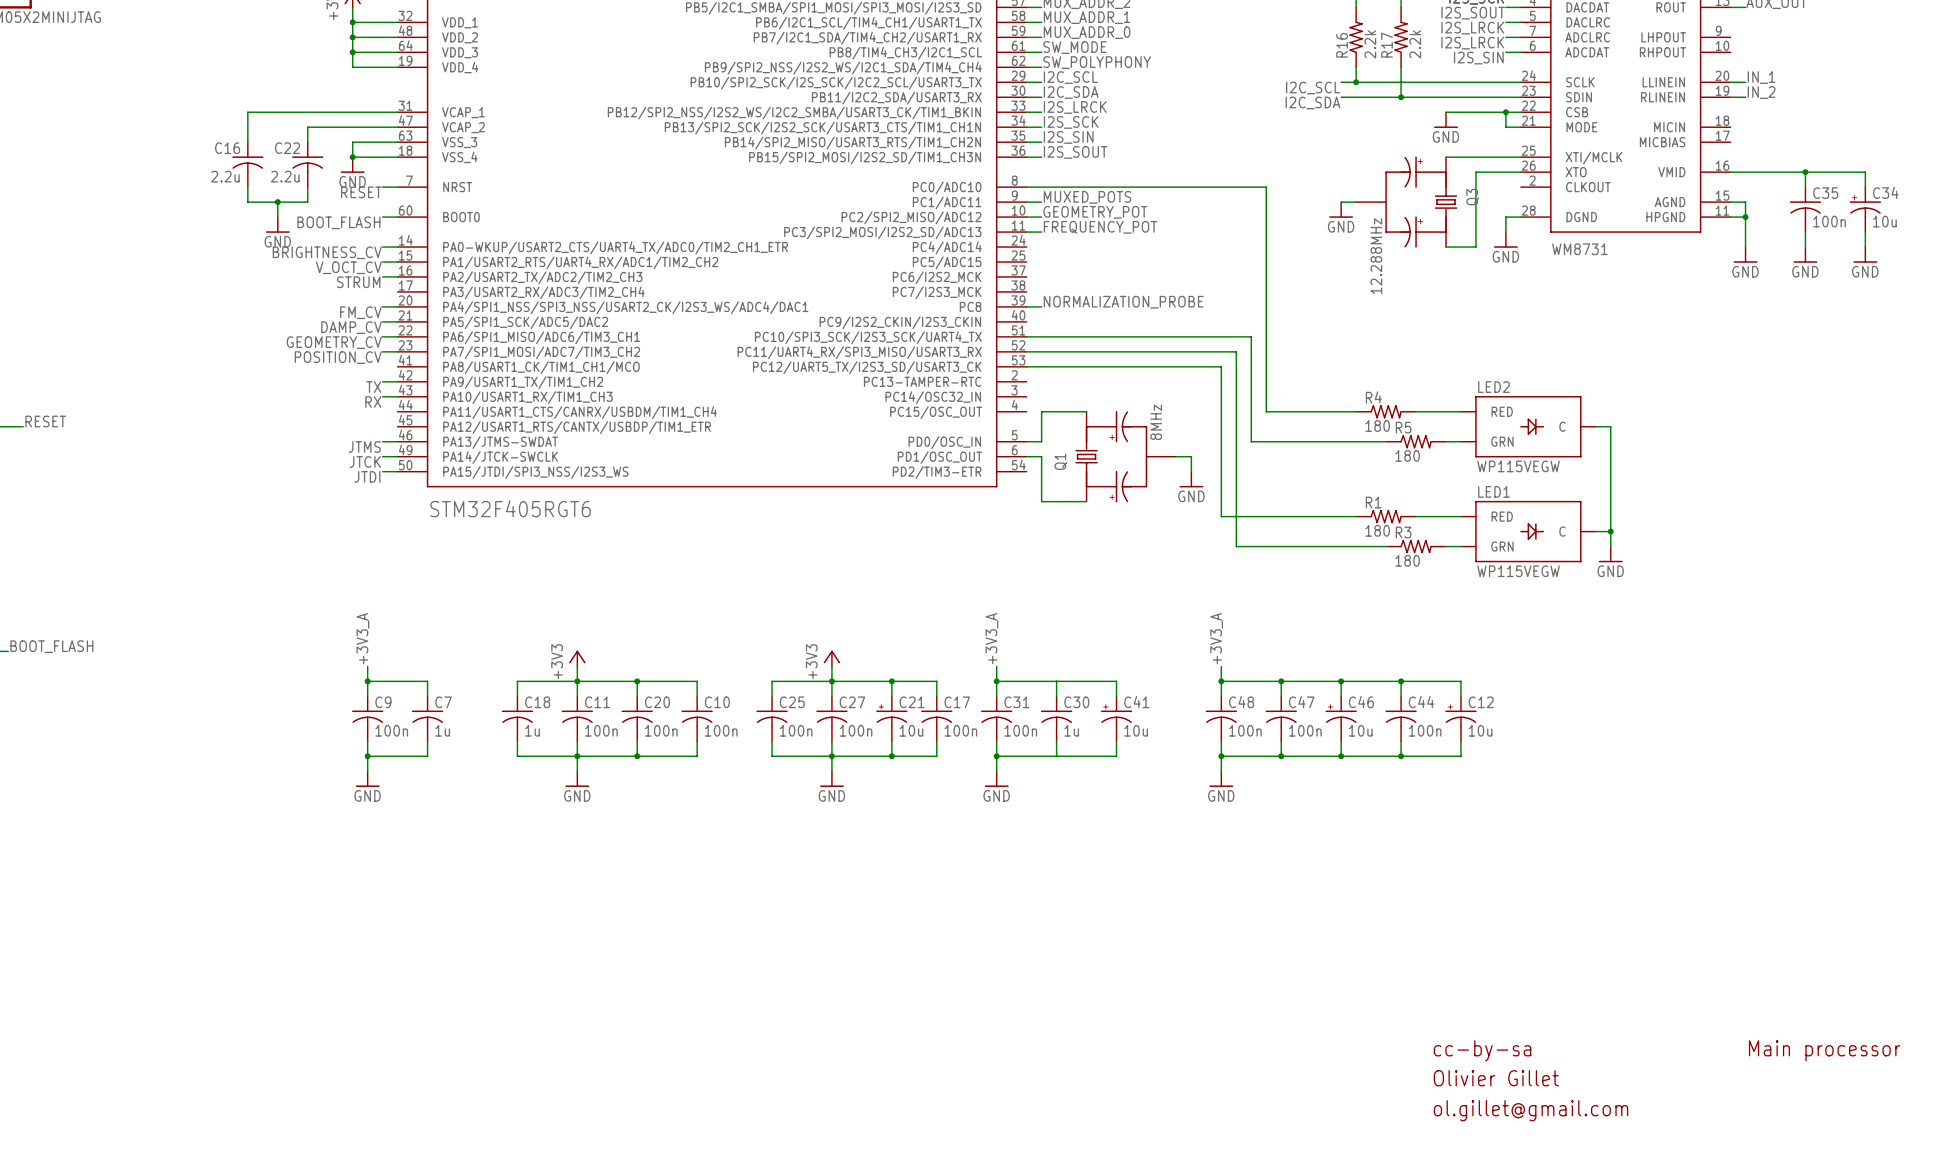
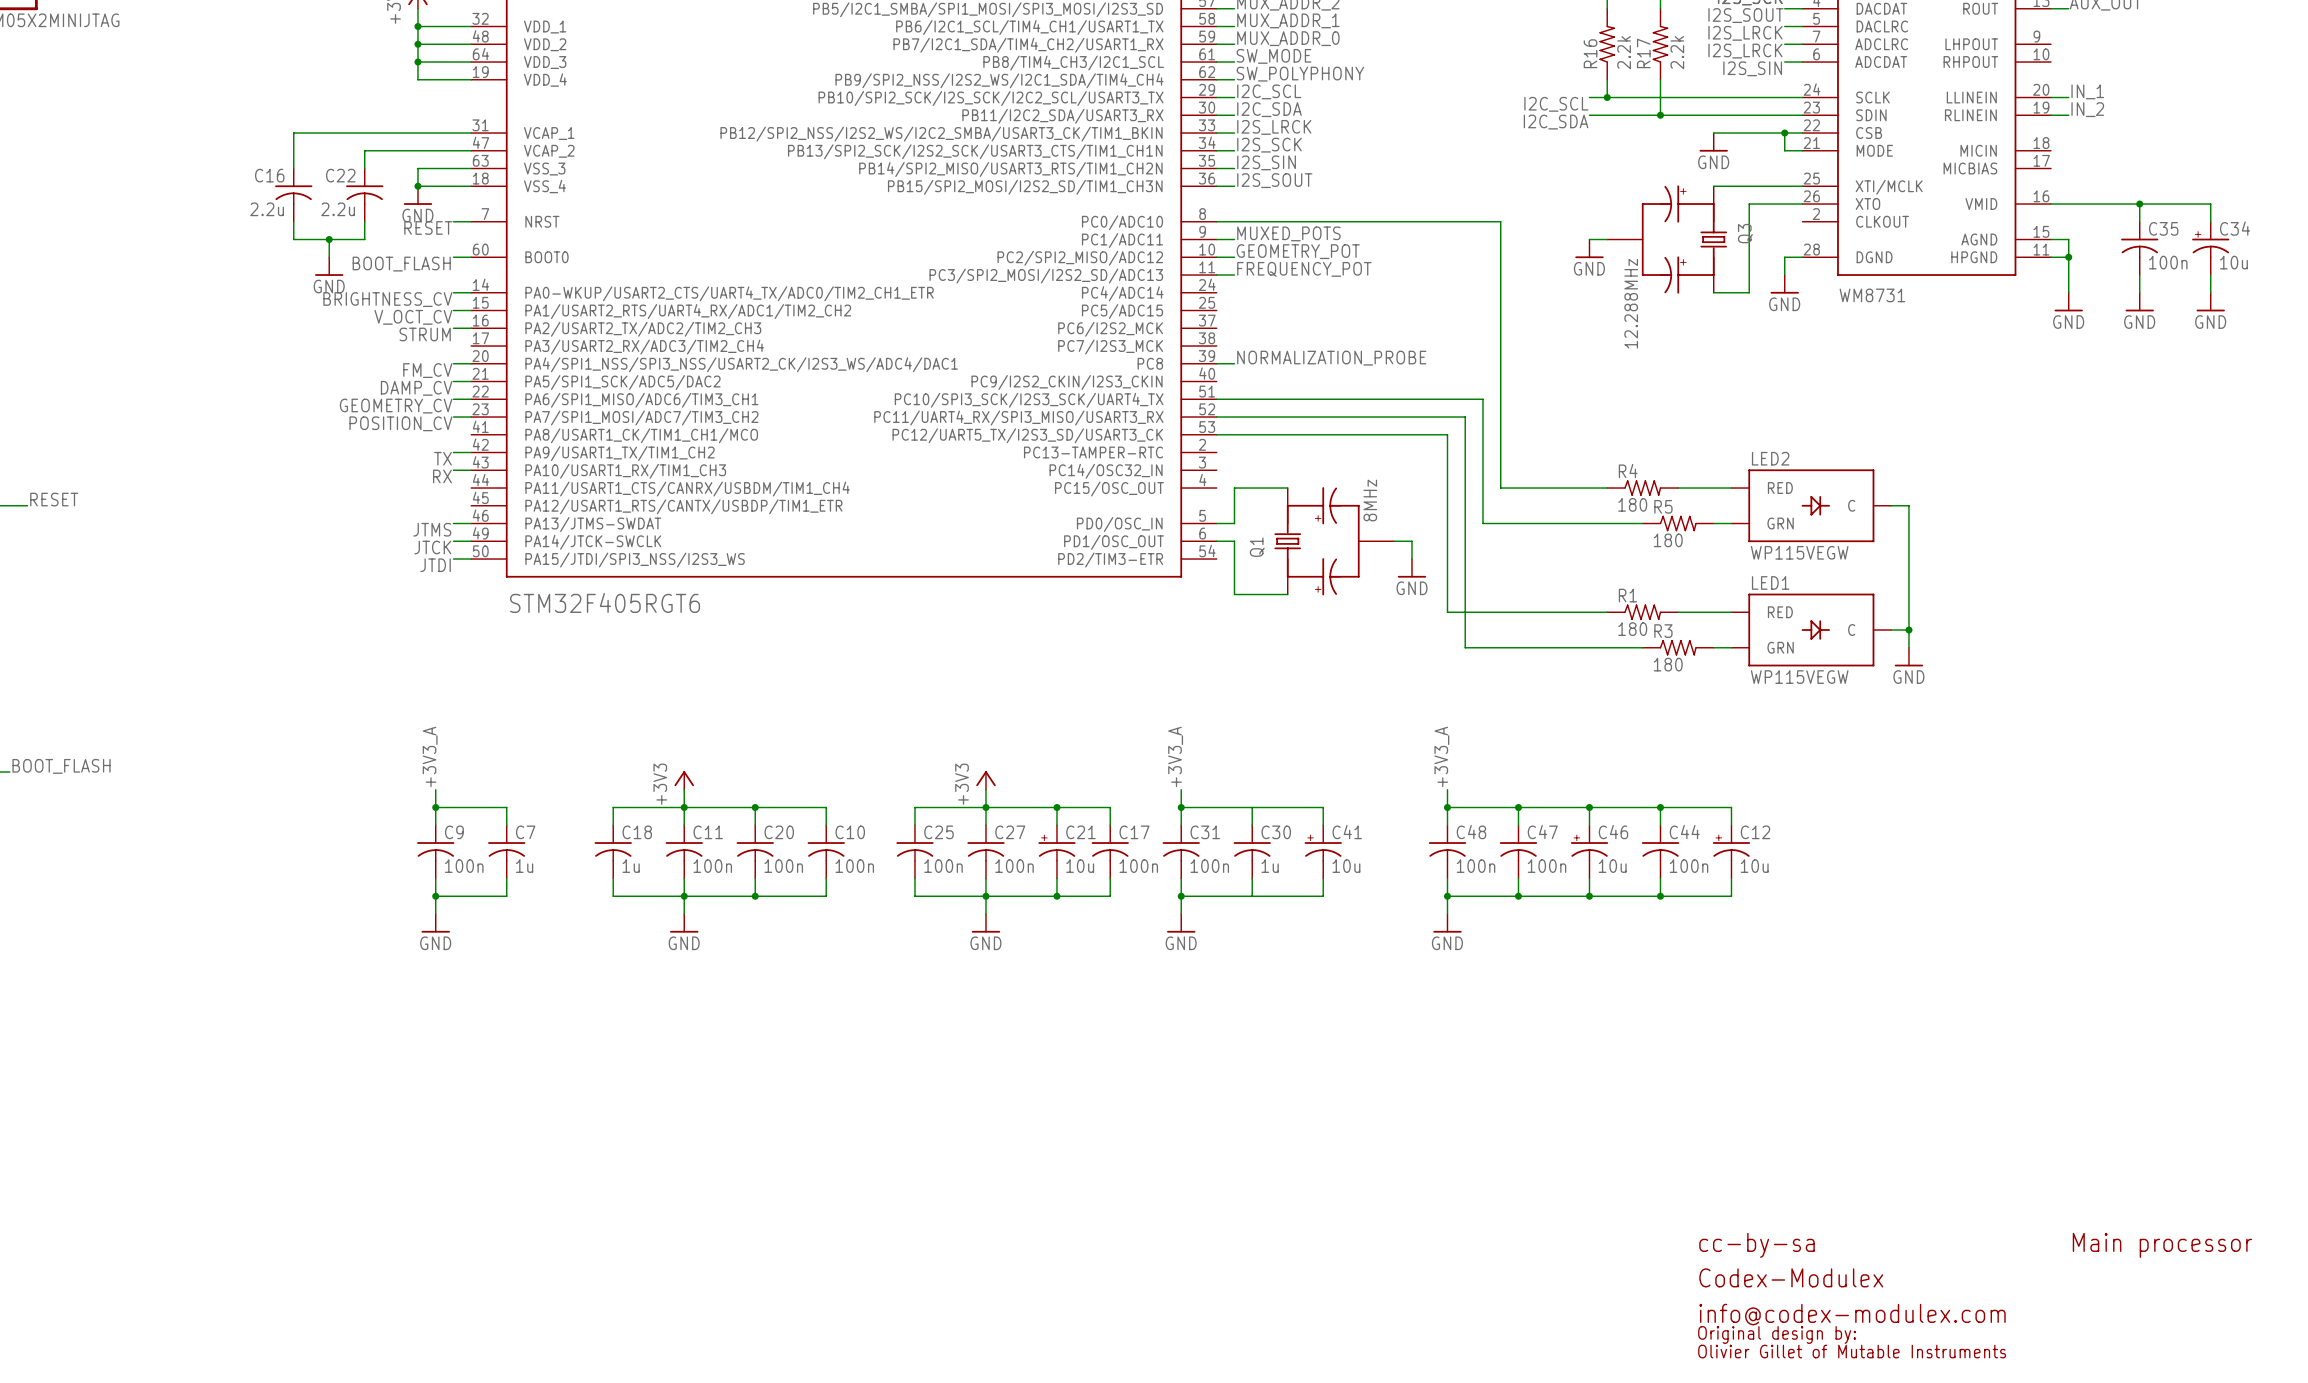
text: Olivier Gillet (1496, 1078) -> Codex-Modulex (1791, 1277)
text: ol.gillet@gmail.com (1530, 1110) -> info@codex-modulex.com (1852, 1314)
text: none -> Original design by: (1777, 1334)
text: none -> Olivier Gillet of Mutable Instruments (1852, 1351)

